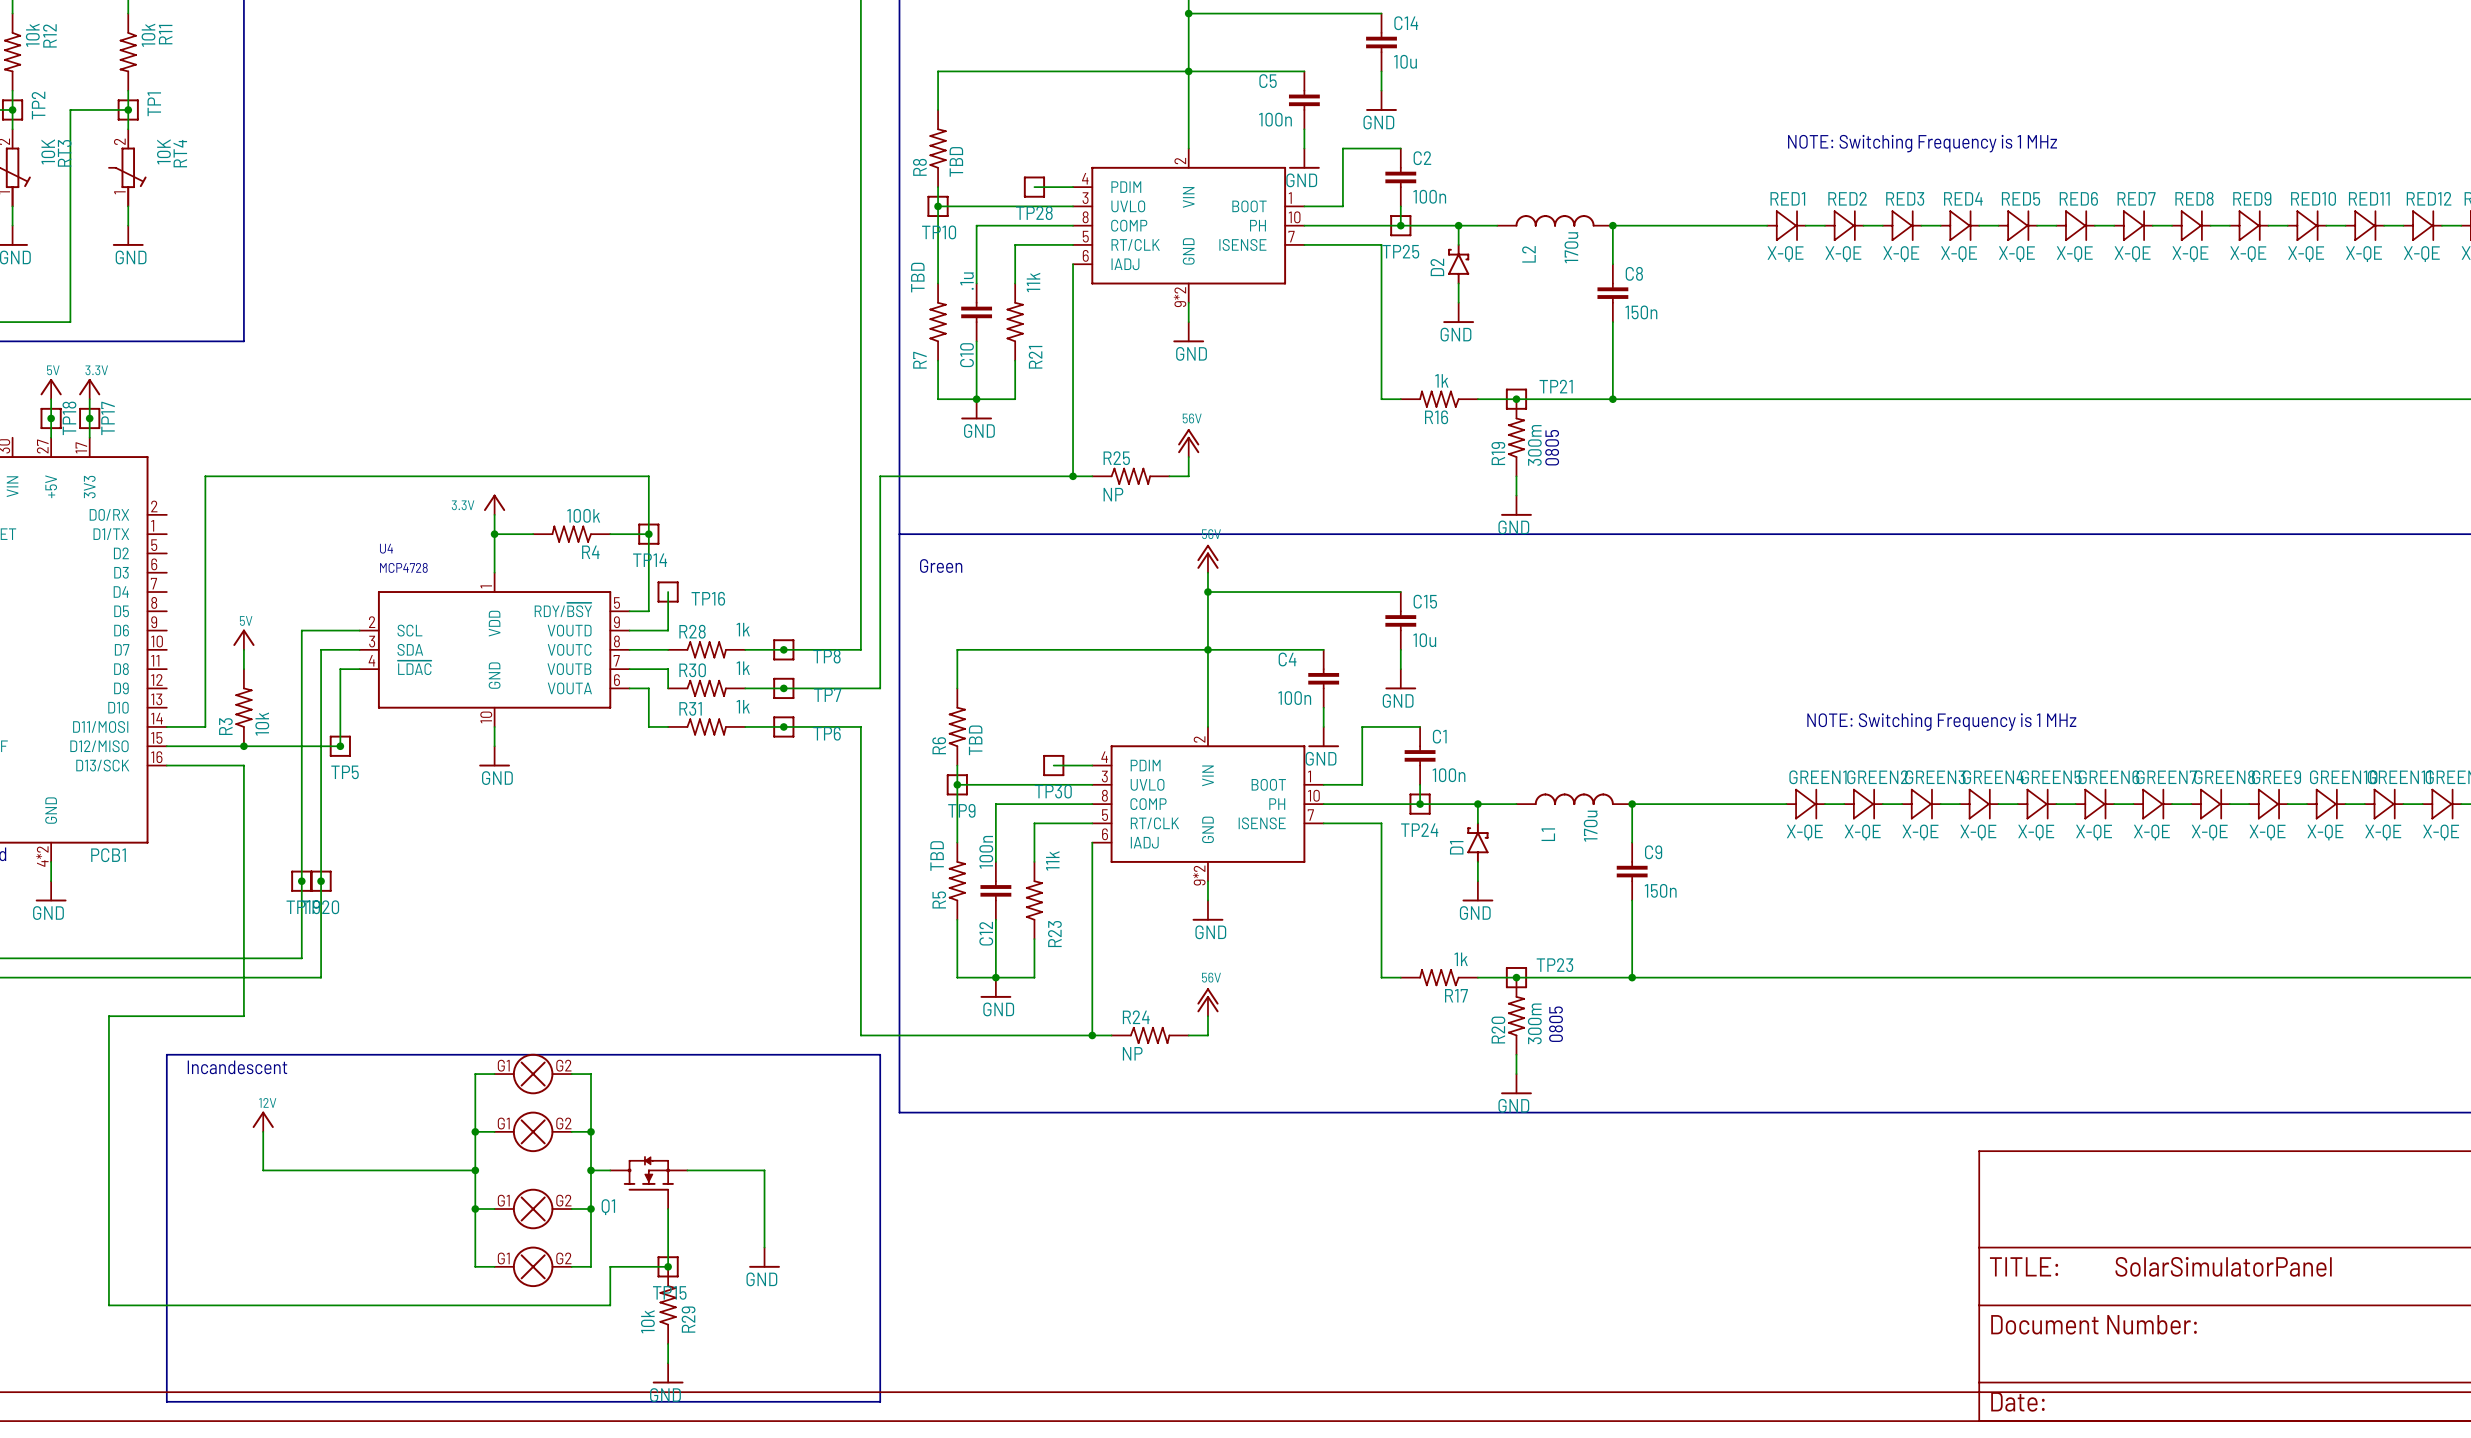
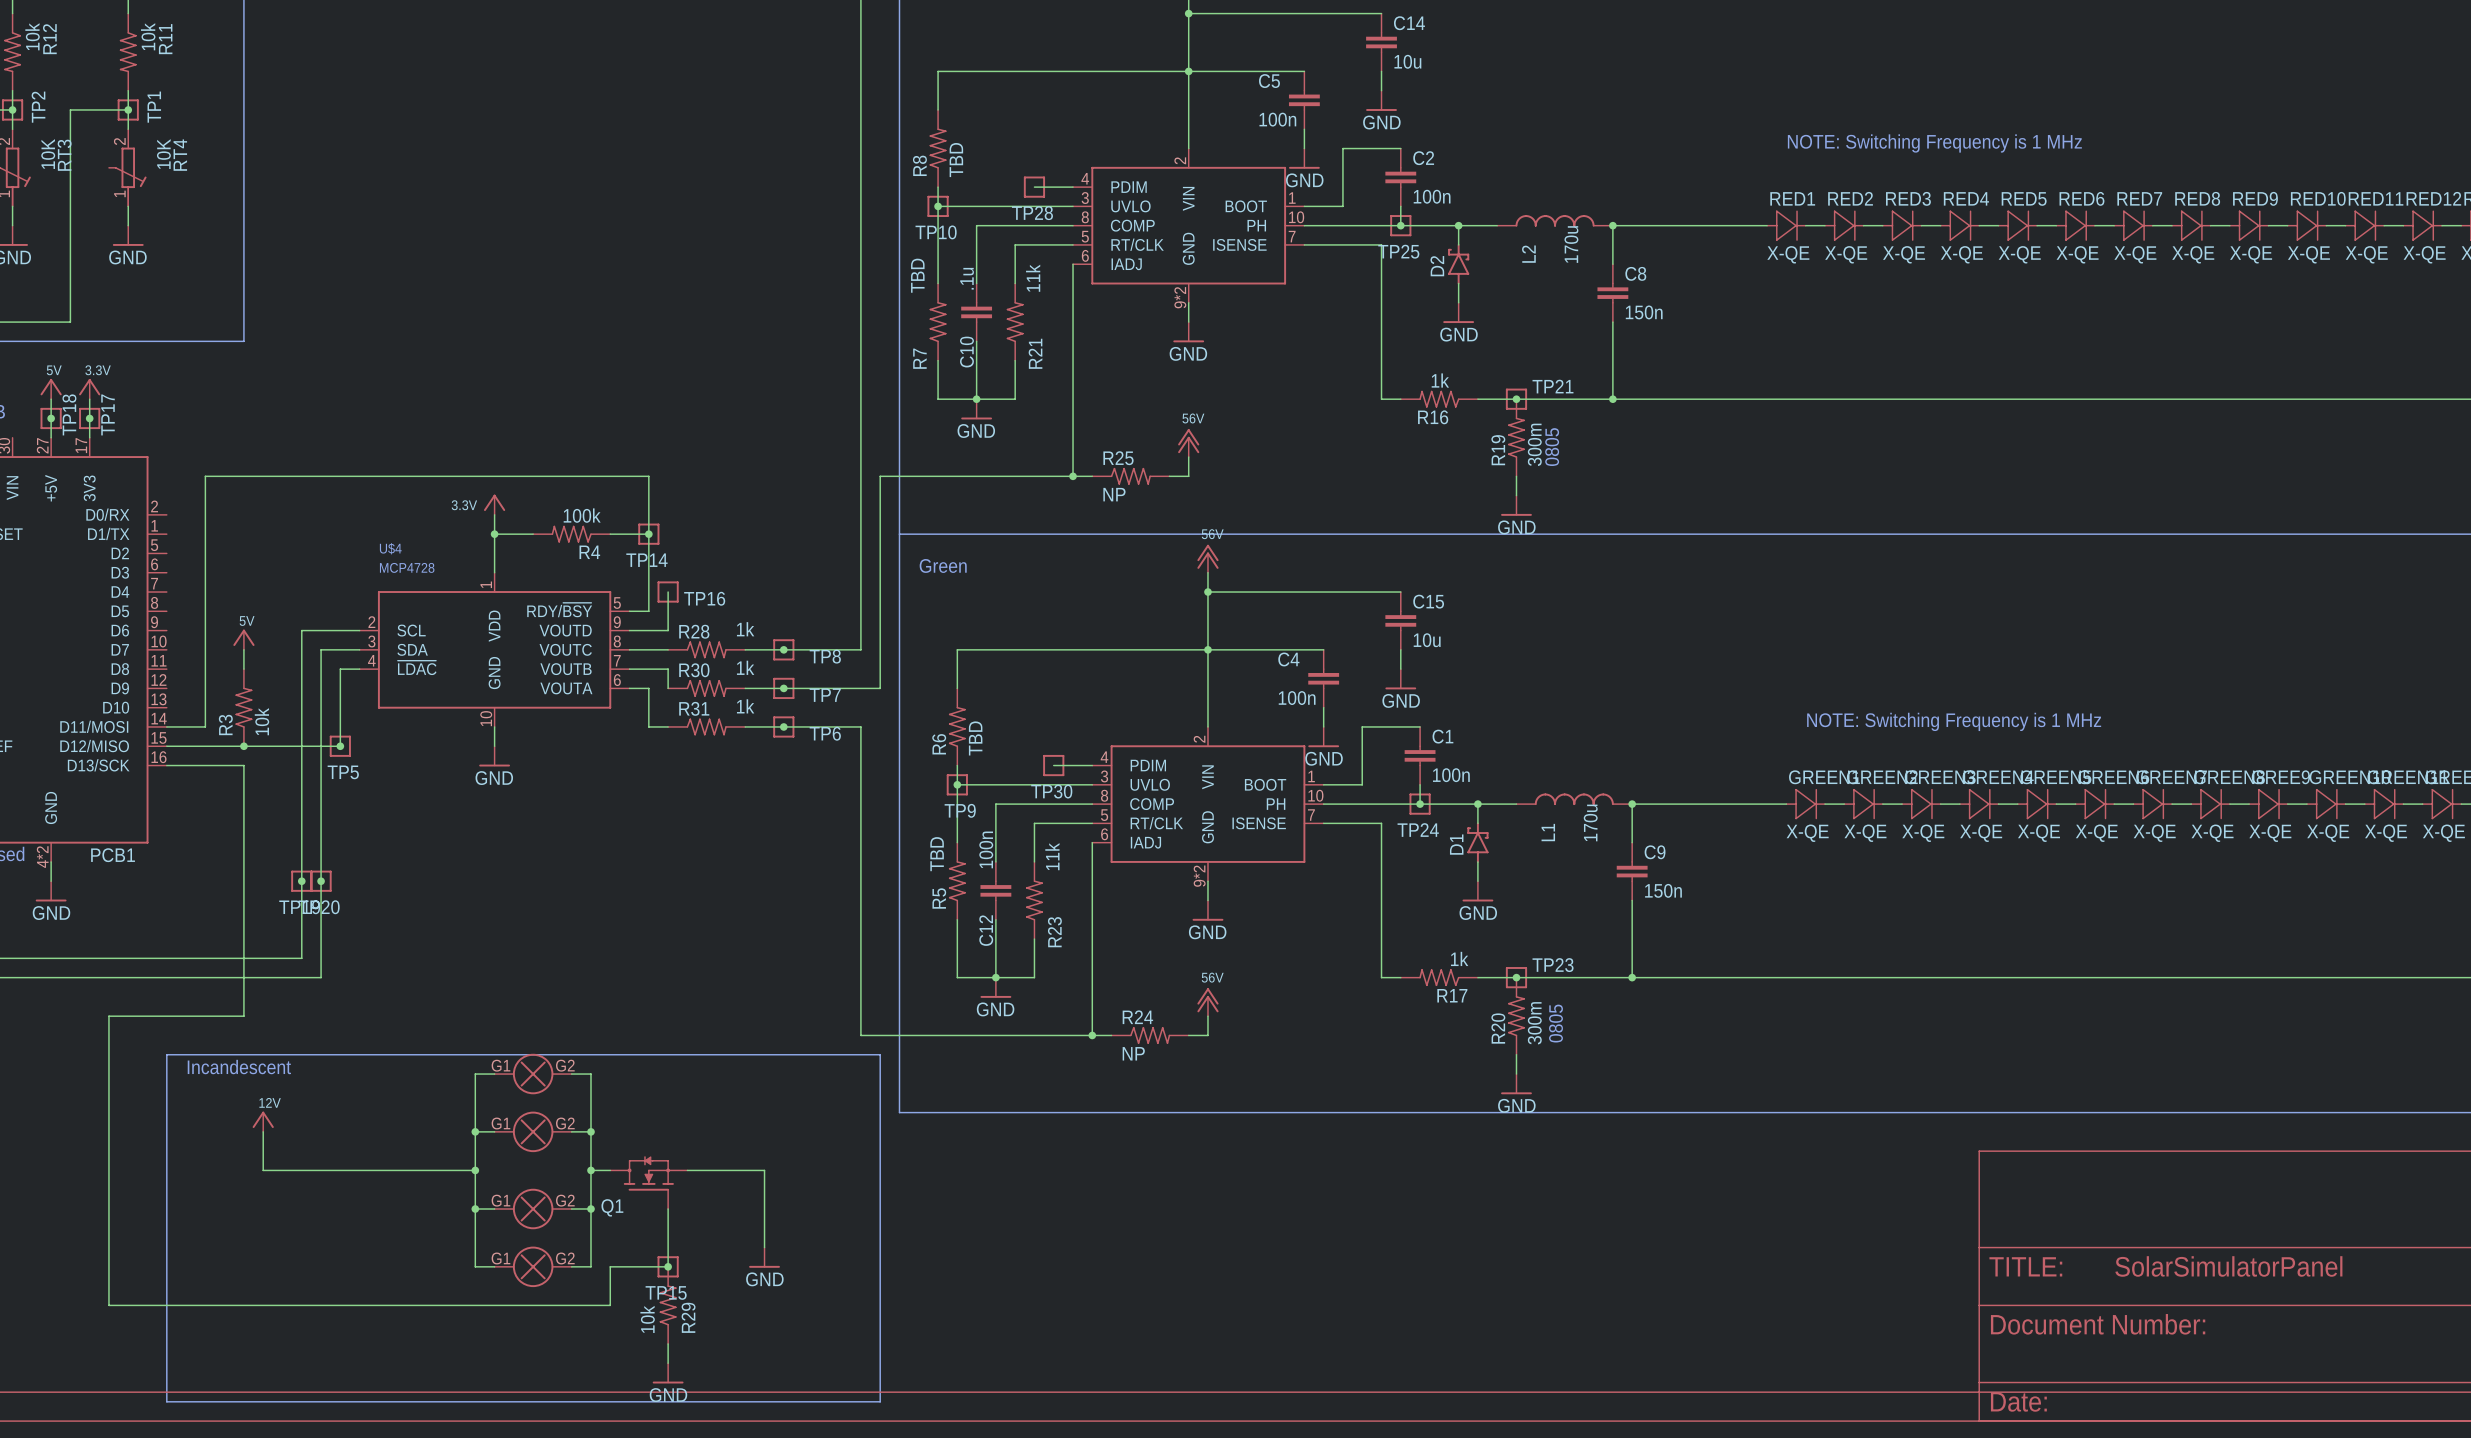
U4 name: U4 (386, 548) -> U$4 (390, 548)

